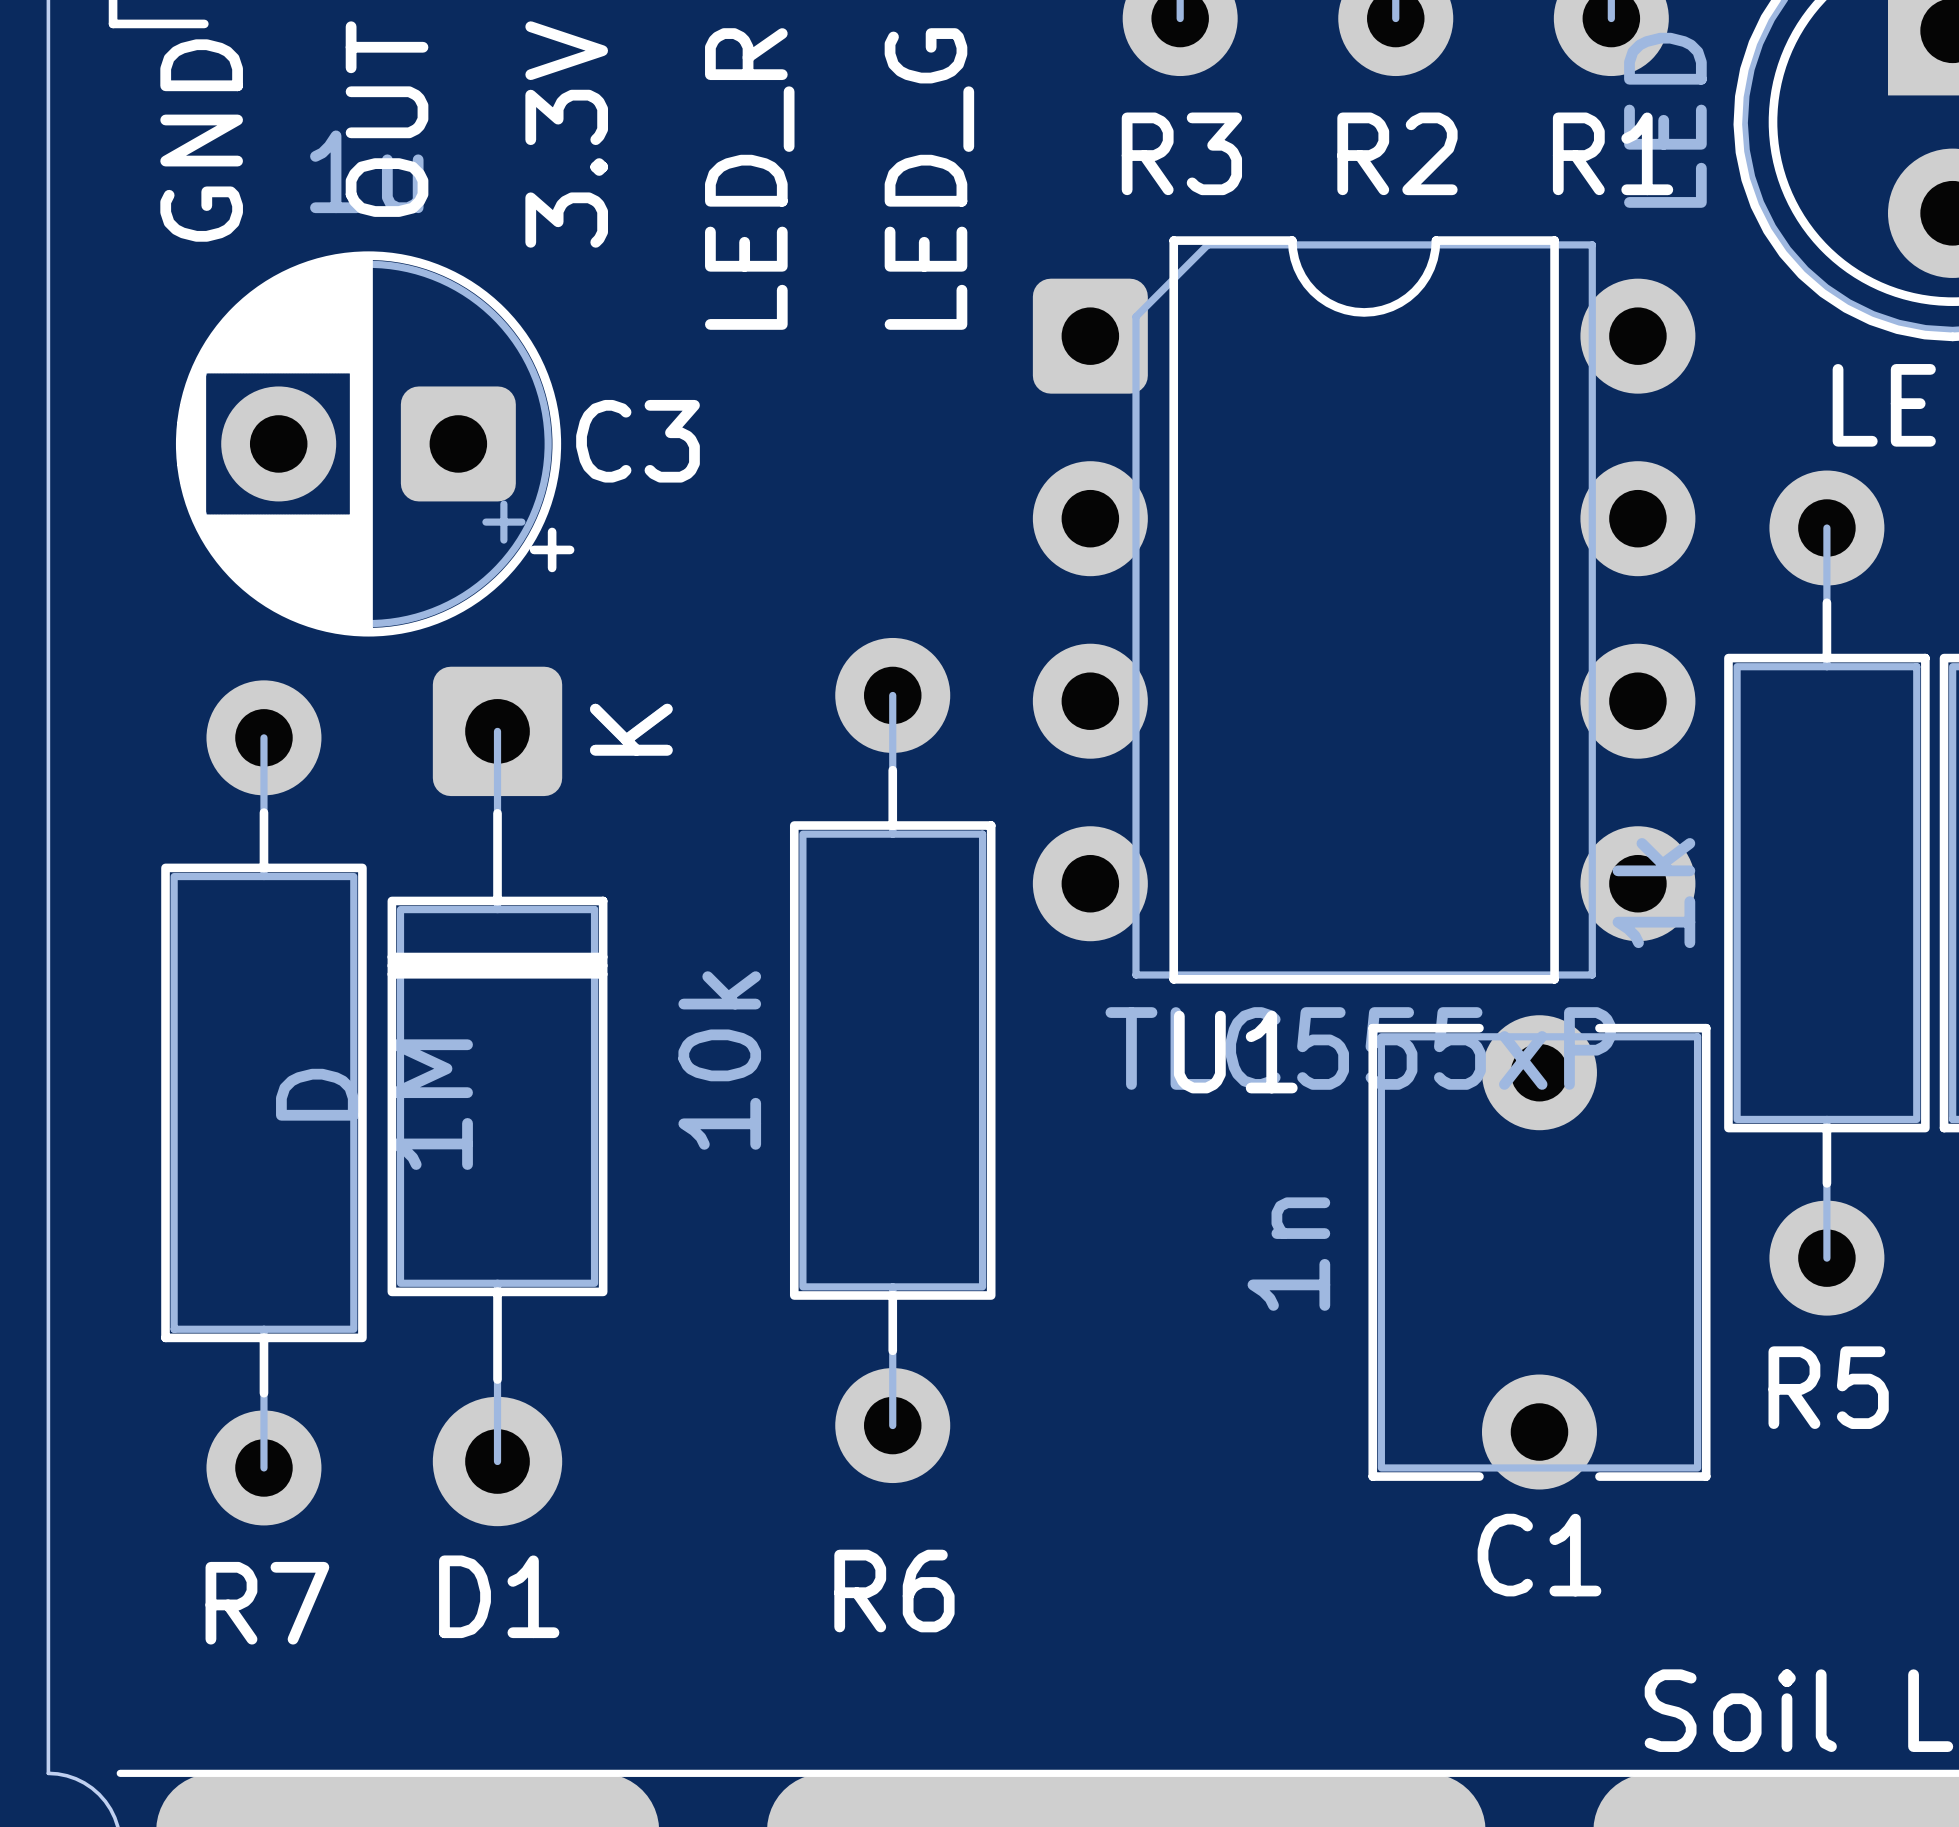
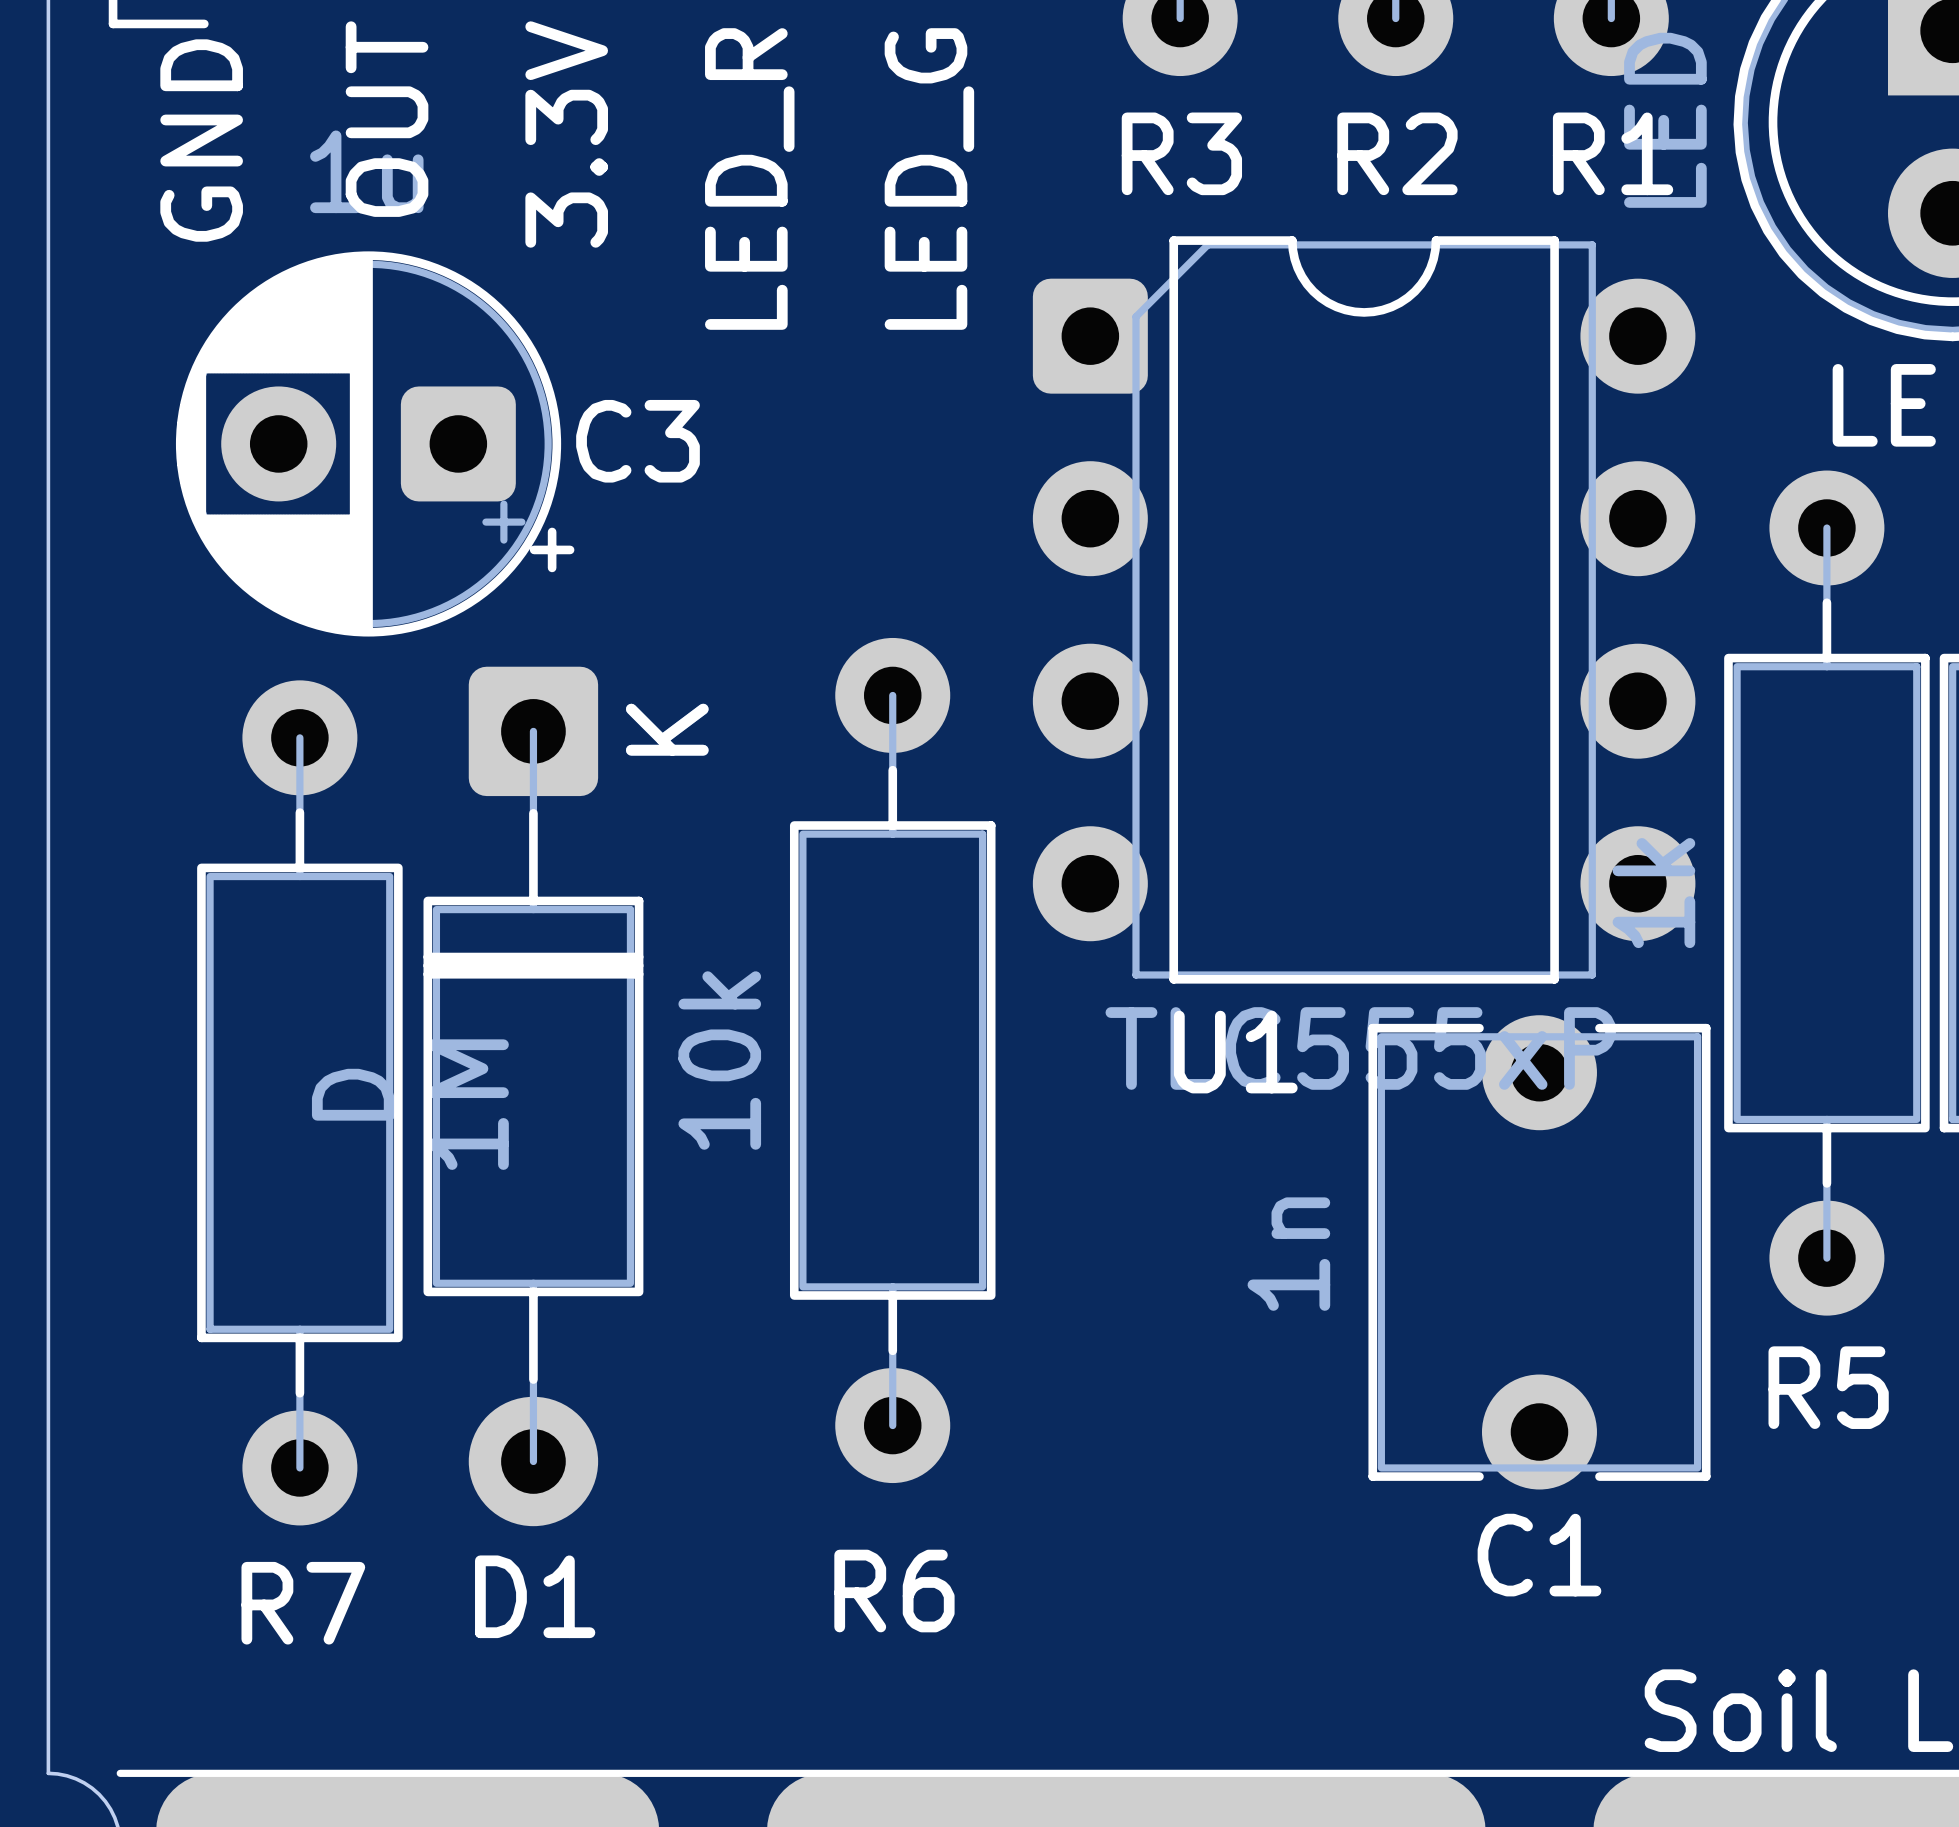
D1 position: (497, 1096) -> (533, 1096)
R7 position: (263, 1102) -> (299, 1102)

